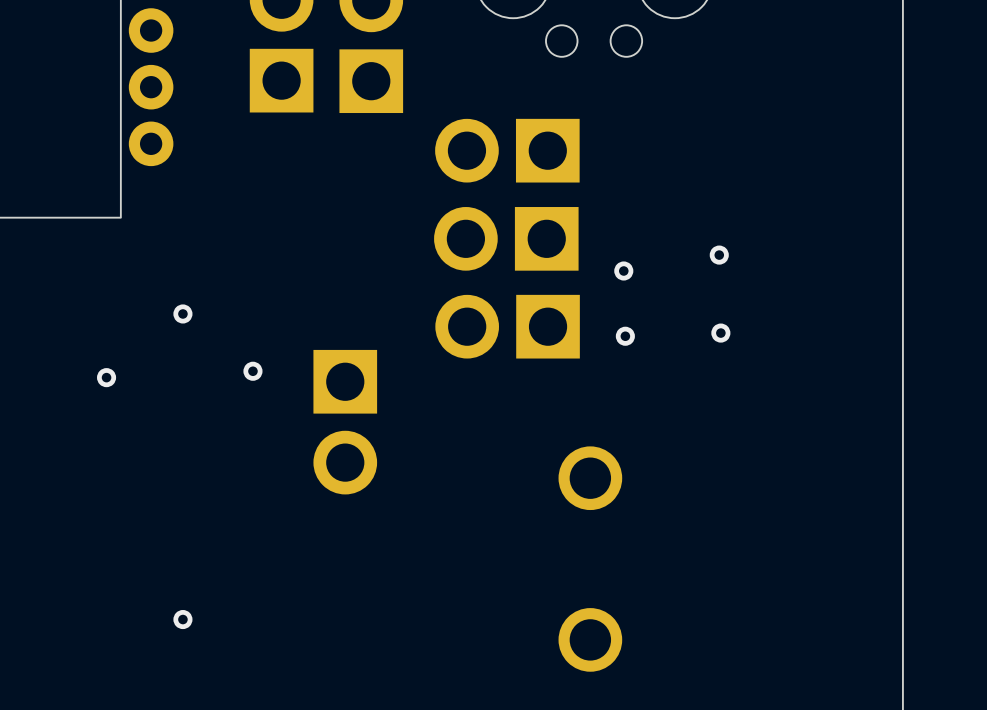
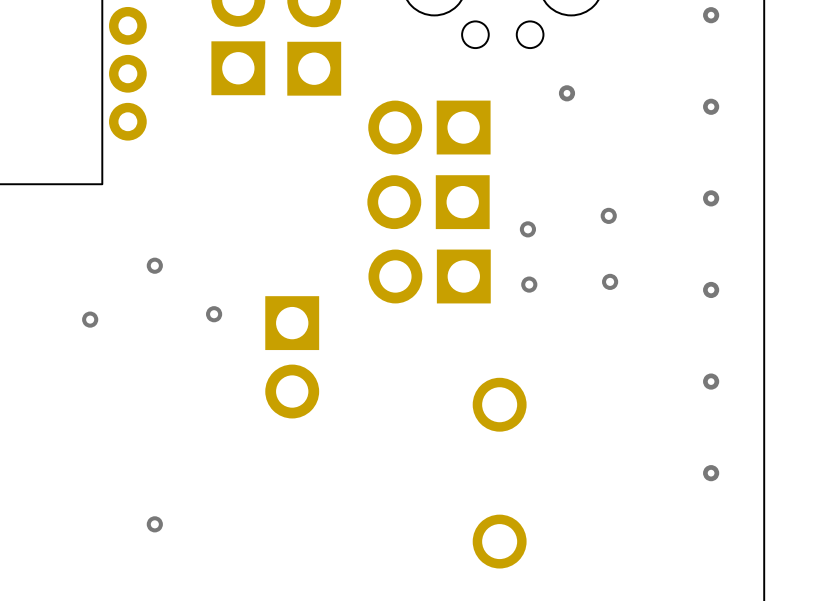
via: none -> (711, 15)
via: none -> (566, 93)
via: none -> (711, 106)
via: none -> (711, 198)
via: none -> (711, 289)
via: none -> (711, 381)
via: none -> (711, 473)

